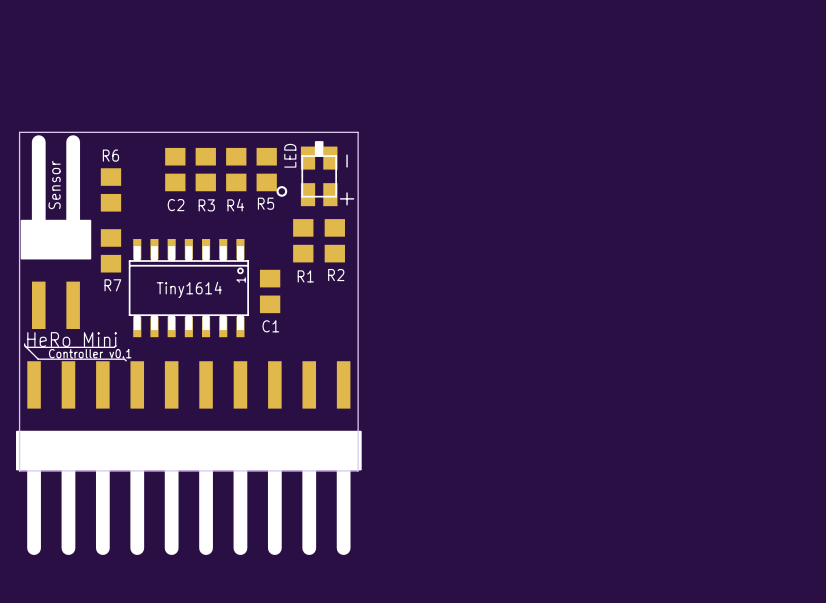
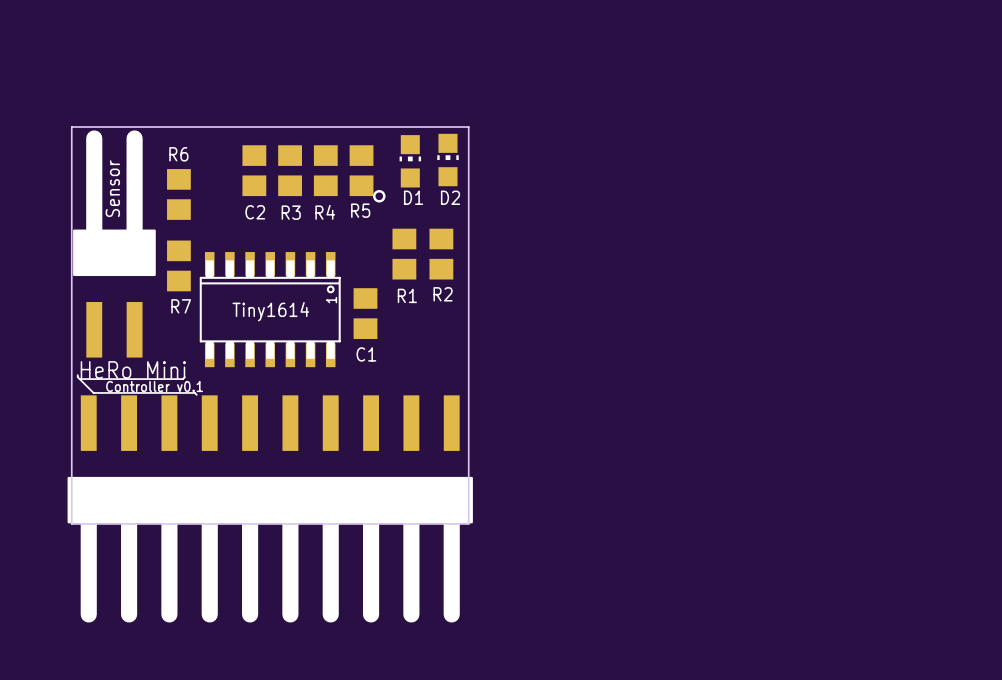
D2: none -> (447, 160)
D1: none -> (410, 161)
LED: (319, 173) -> none

